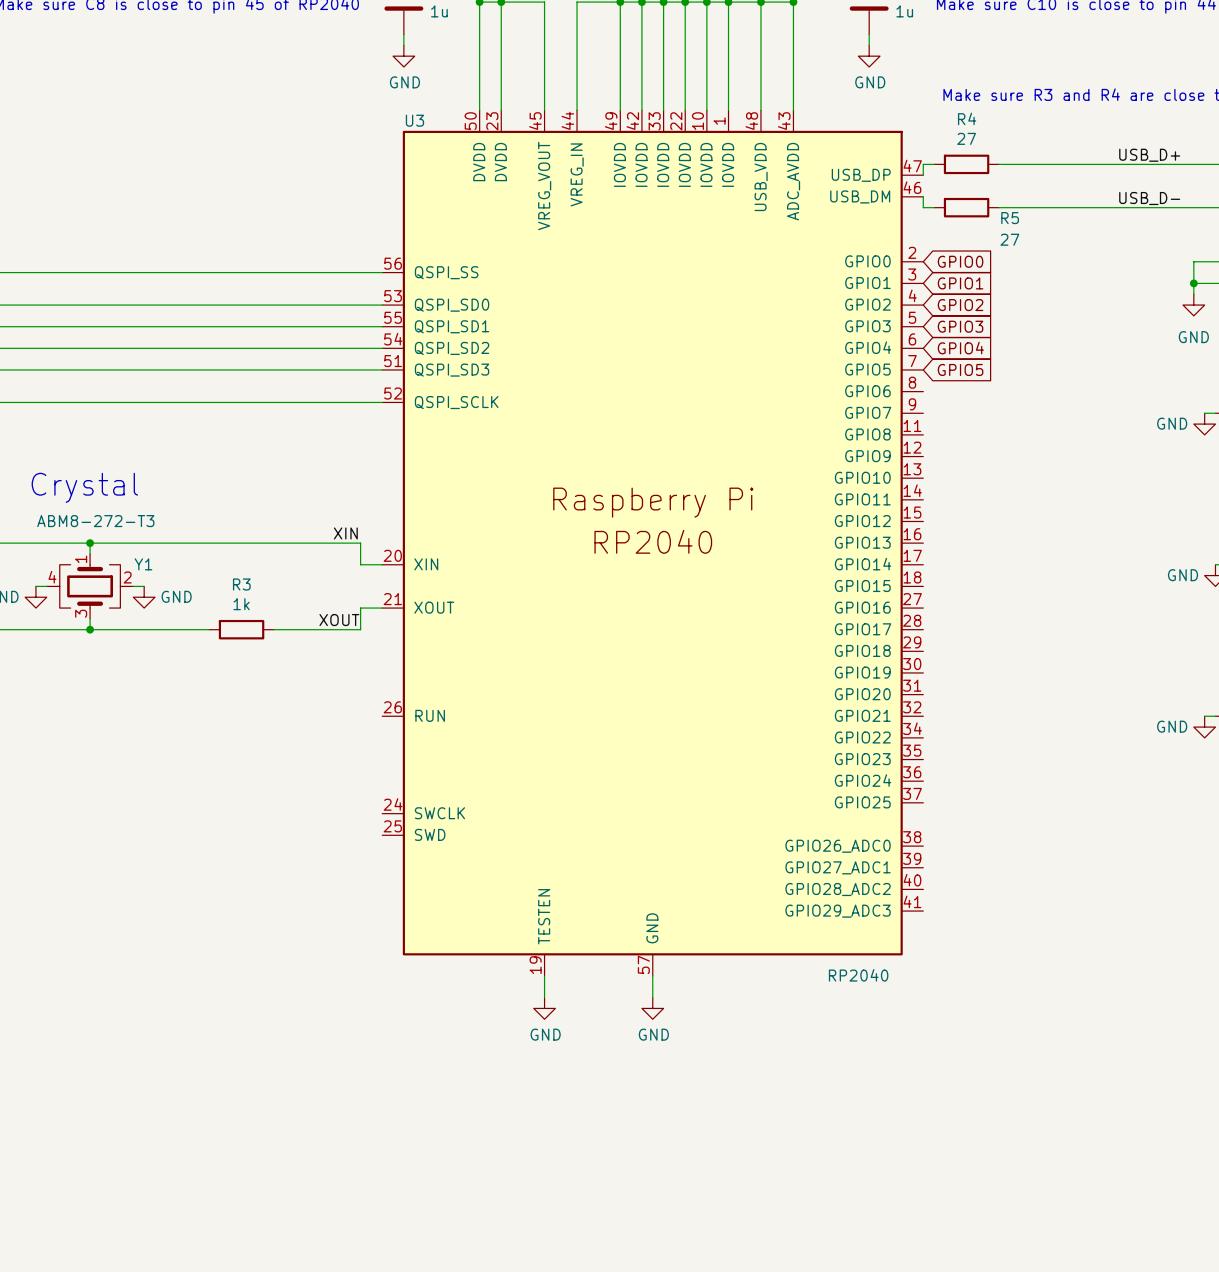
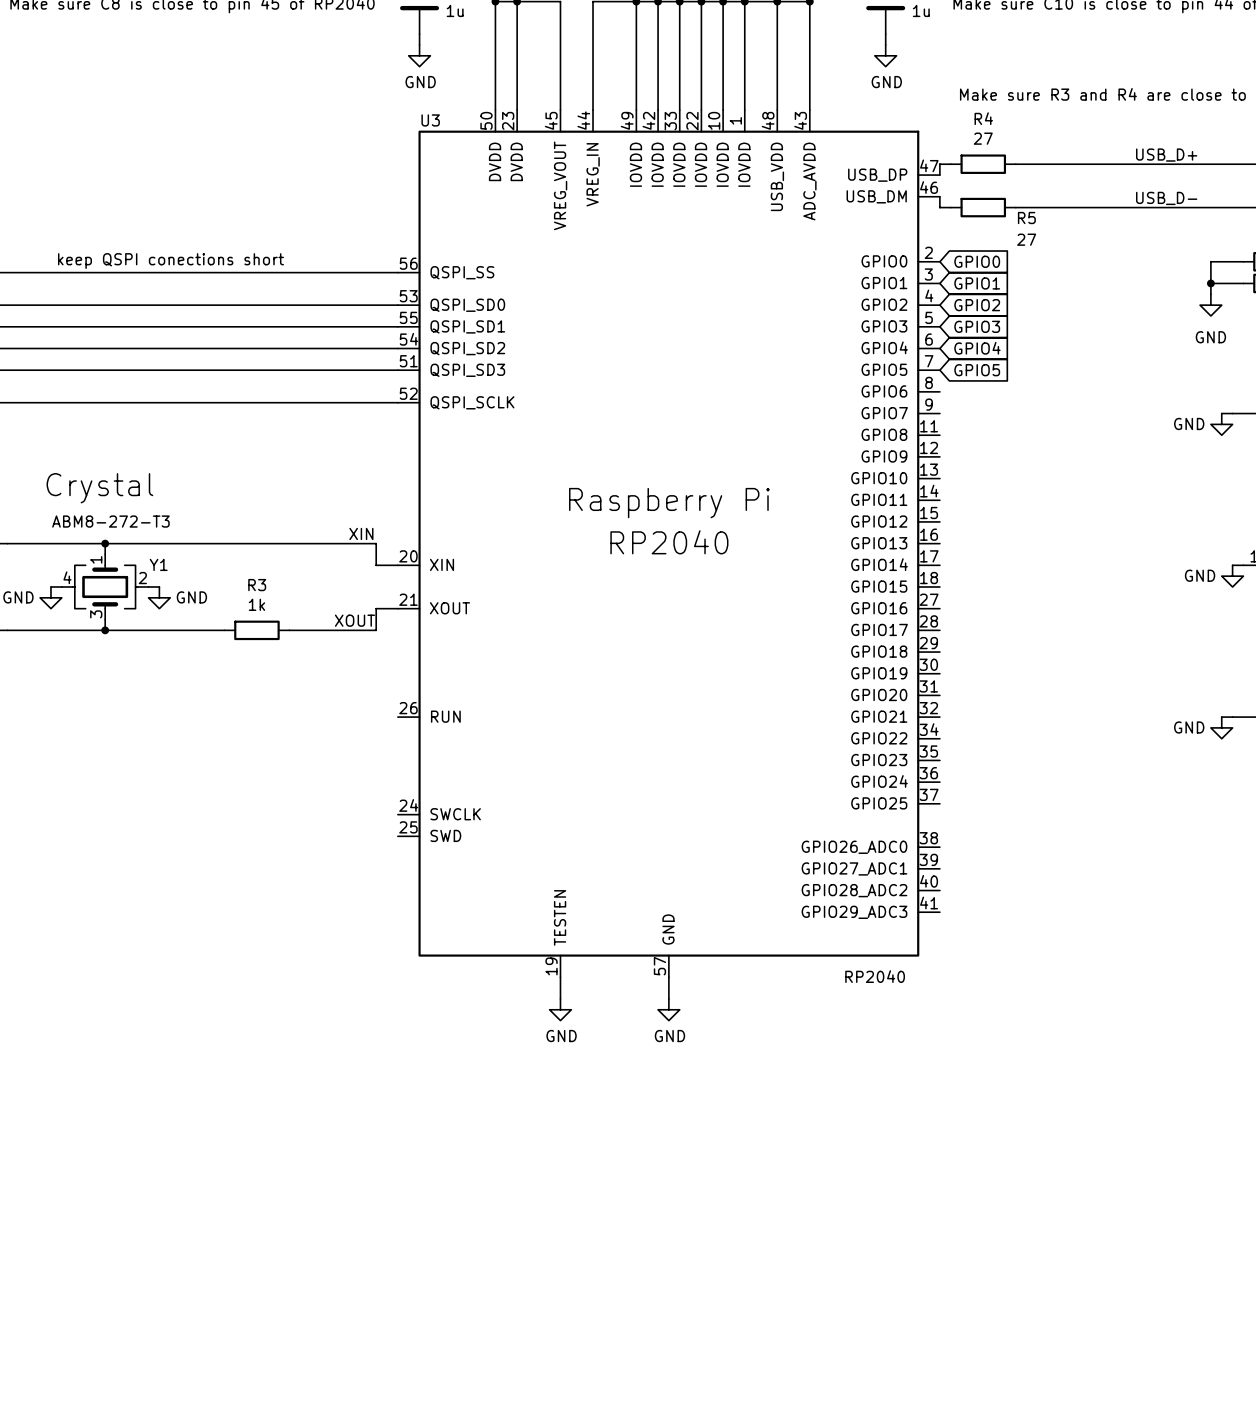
text: none -> keep QSPI conections short (171, 261)

